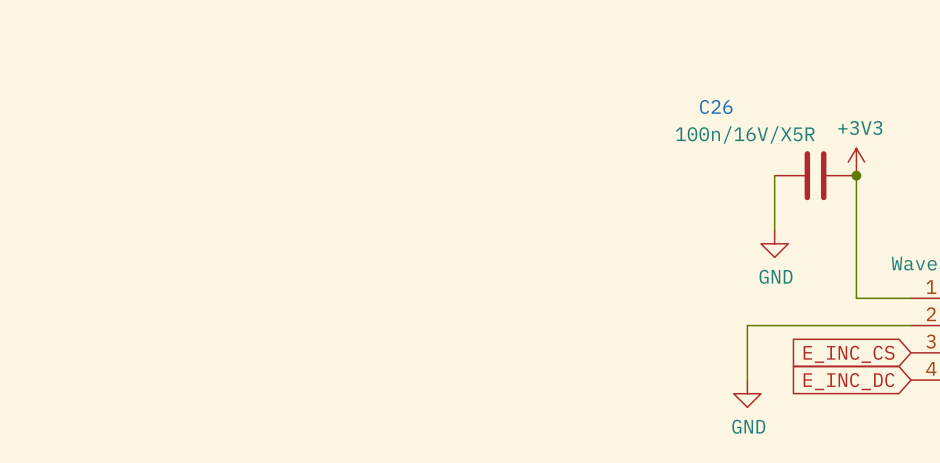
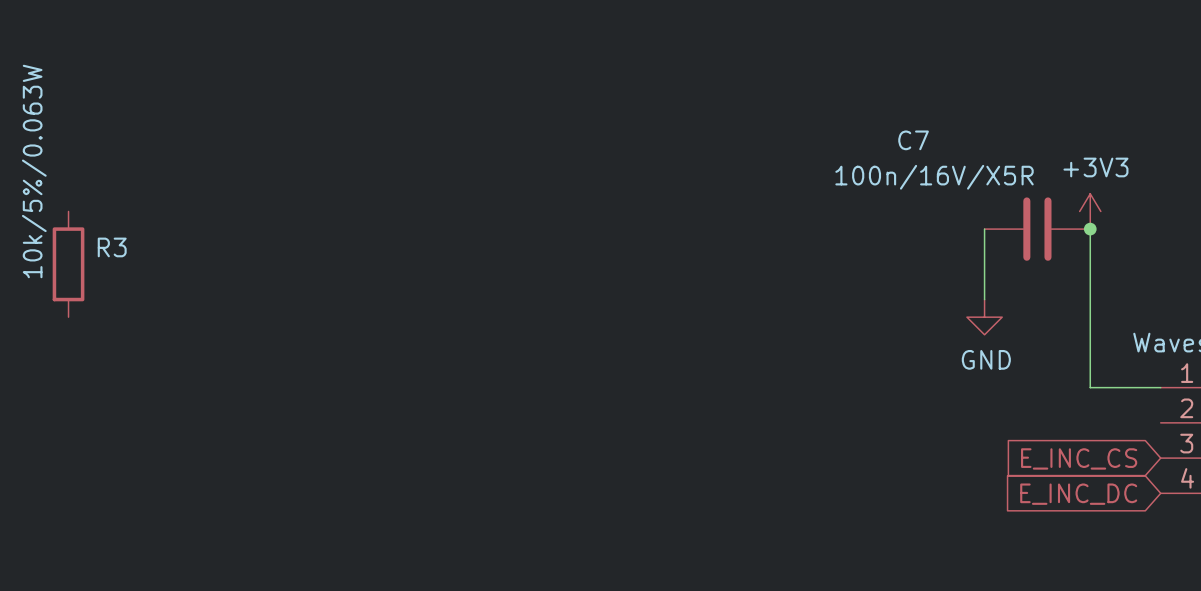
C26 name: C26 (716, 107) -> C7 (913, 140)
R3: none -> 10k/5%/0.063W (68, 264)
wire: (910, 325) (747, 325) (747, 380) -> none
power symbol: GND (747, 393) -> none

